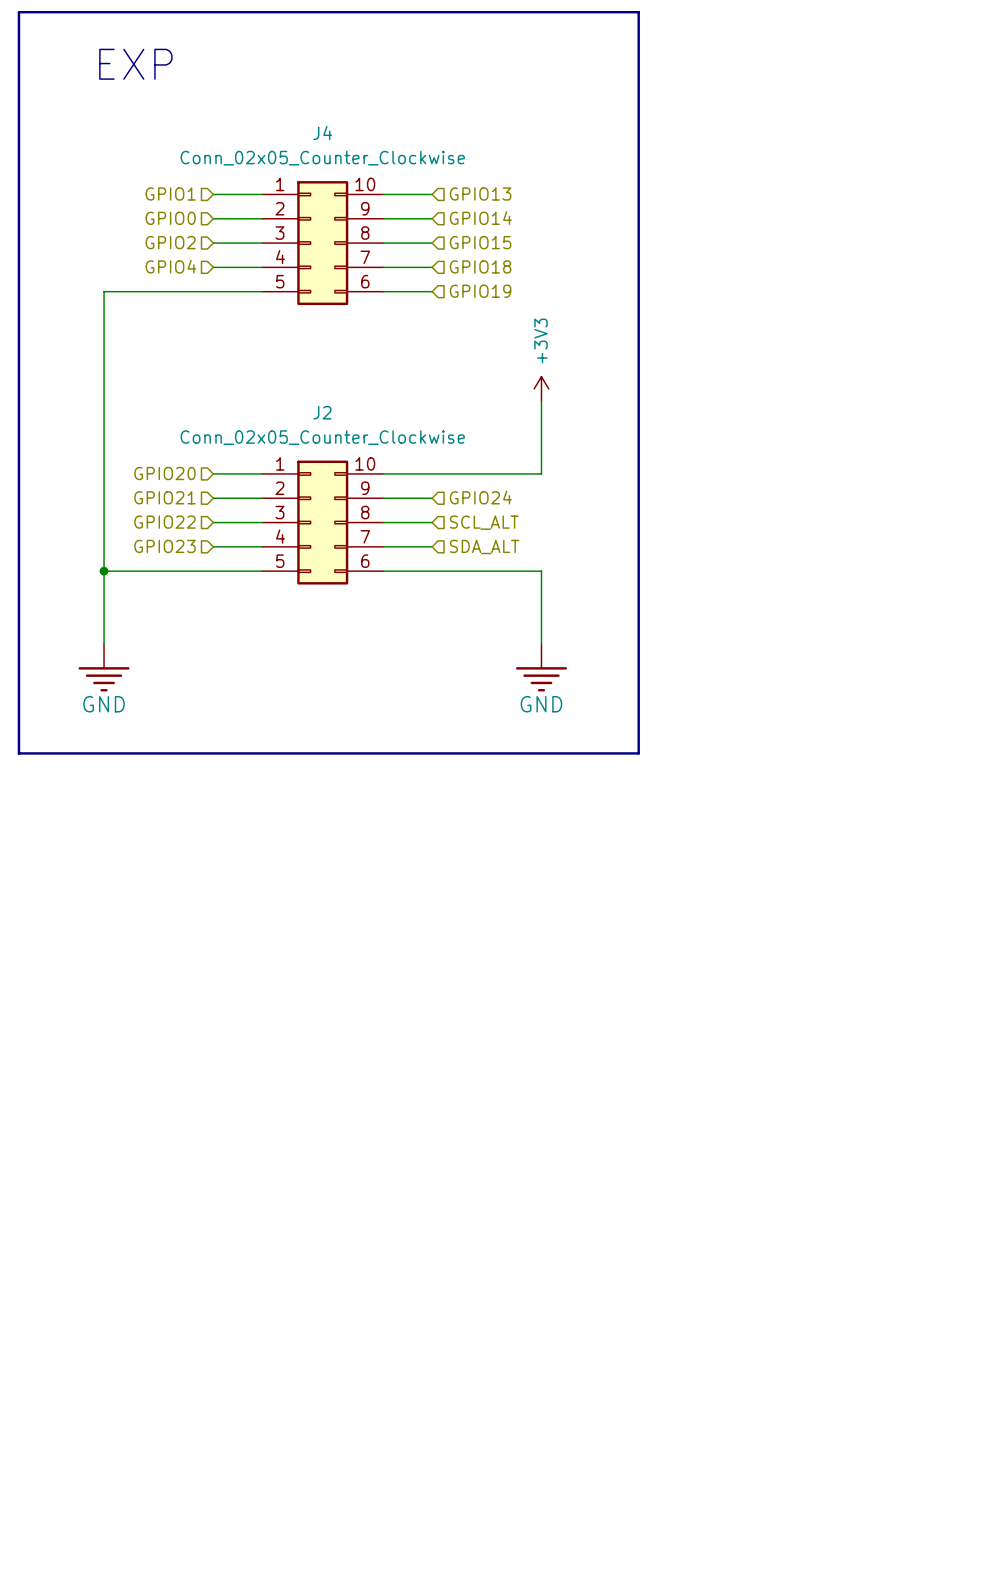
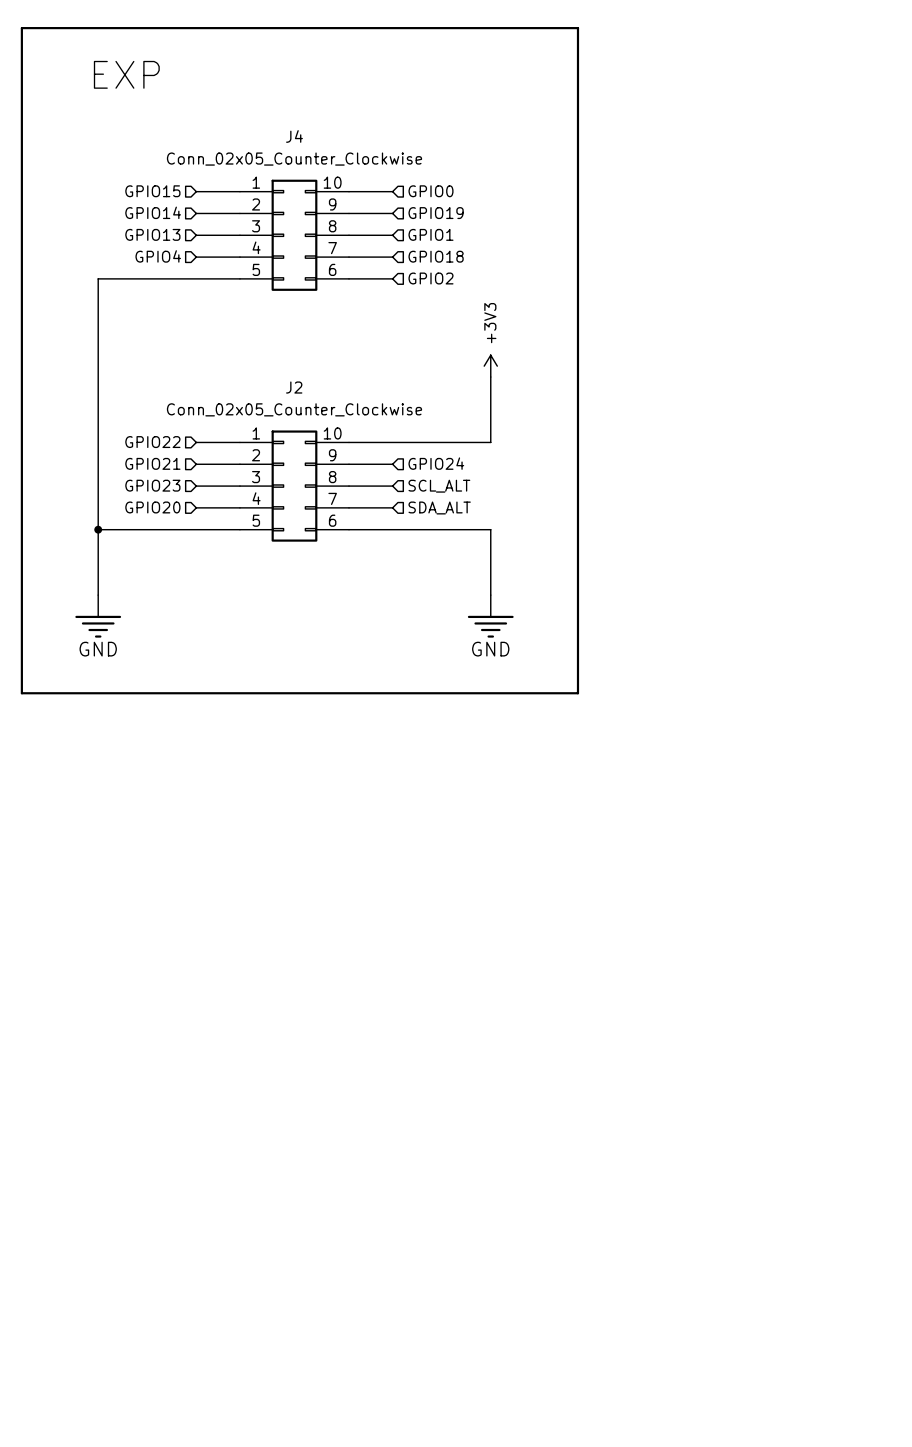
hierarchical label: GPIO1 (170, 194) -> GPIO15 (152, 191)
hierarchical label: GPIO13 (480, 194) -> GPIO0 (430, 191)
hierarchical label: GPIO0 (170, 218) -> GPIO14 (153, 212)
hierarchical label: GPIO14 (480, 218) -> GPIO19 (436, 213)
hierarchical label: GPIO2 (170, 242) -> GPIO13 (152, 234)
hierarchical label: GPIO15 (480, 242) -> GPIO1 (430, 234)
hierarchical label: GPIO19 (480, 291) -> GPIO2 (430, 278)
hierarchical label: GPIO20 (164, 473) -> GPIO22 (152, 442)
hierarchical label: GPIO22 (164, 522) -> GPIO23 (152, 485)
hierarchical label: GPIO23 (164, 546) -> GPIO20 (152, 507)

